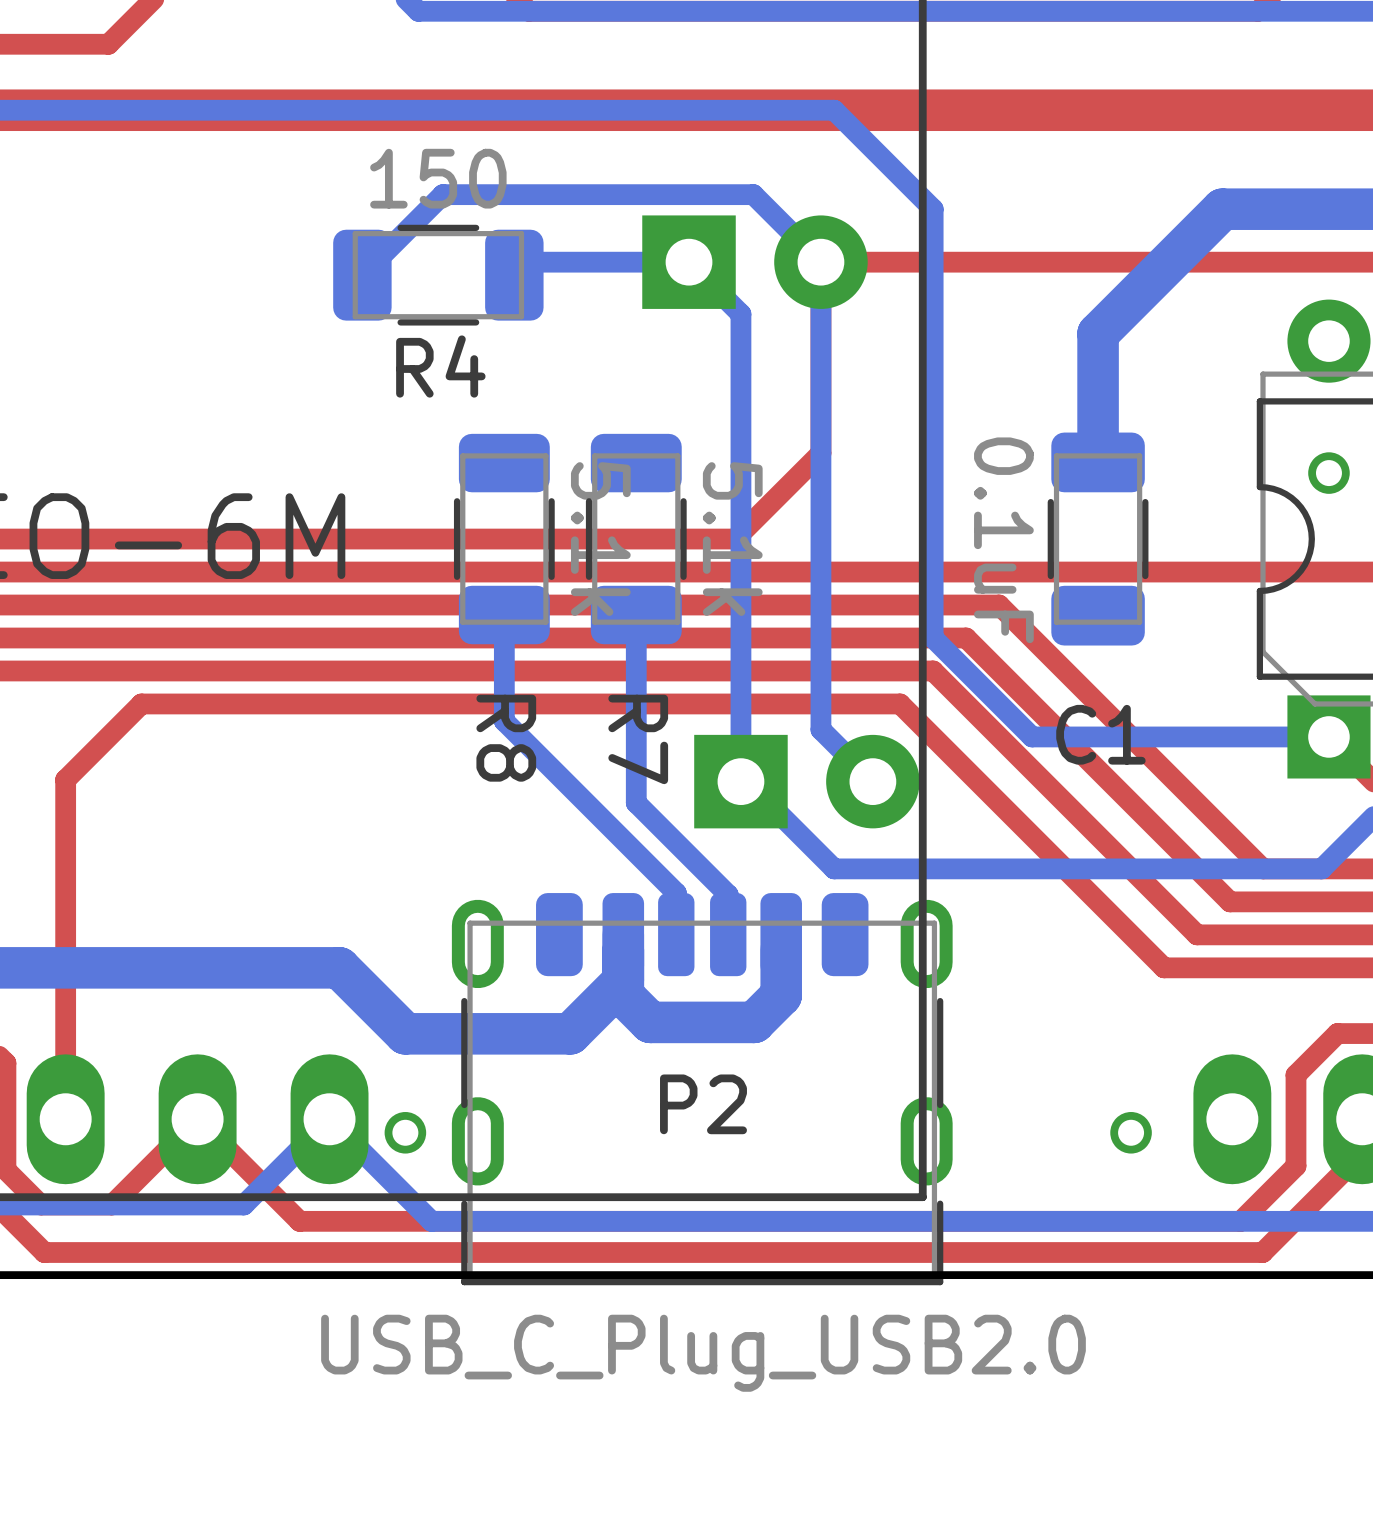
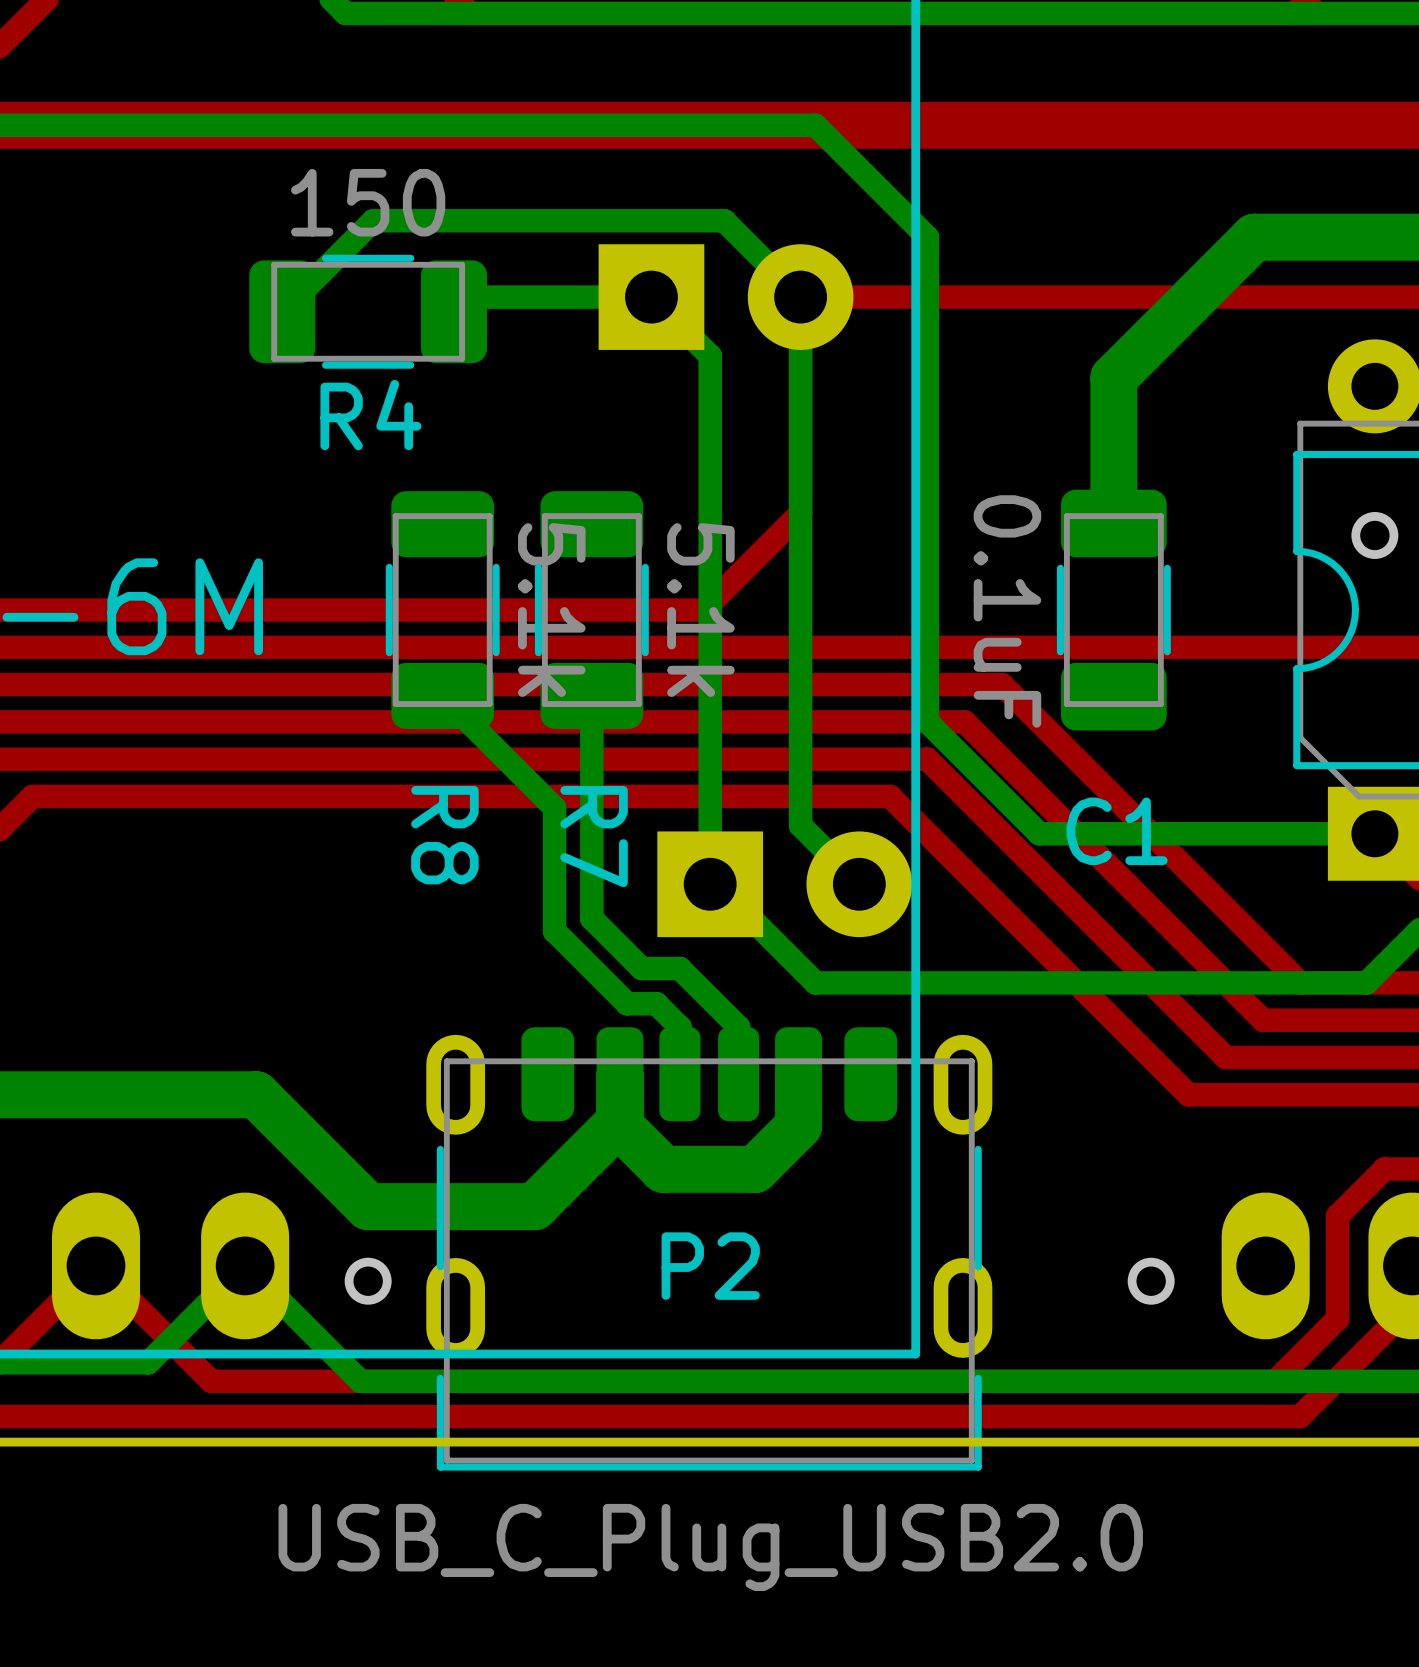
bottom track: (504, 615) (504, 721) (676, 893) (676, 934) -> (442, 695) (554, 807) (554, 931) (627, 1003) (656, 1003) (679, 1027) (679, 1074)
bottom track: (636, 802) (728, 894) (728, 934) -> (591, 908) (591, 918) (641, 968) (679, 968) (738, 1027) (738, 1074)
bottom track: (623, 934) (623, 995) (650, 1022) (754, 1022) (781, 995) (781, 949) -> none
bottom track: none -> (798, 1074) (798, 1125) (755, 1169) (663, 1169) (620, 1125) (620, 1074)
bottom track: (623, 980) (570, 1033) (405, 1033) -> (620, 1121) (534, 1206) (368, 1206) (330, 1169)
P2 position: (702, 1089) -> (709, 1248)
via position: (405, 1132) -> (368, 1281)

